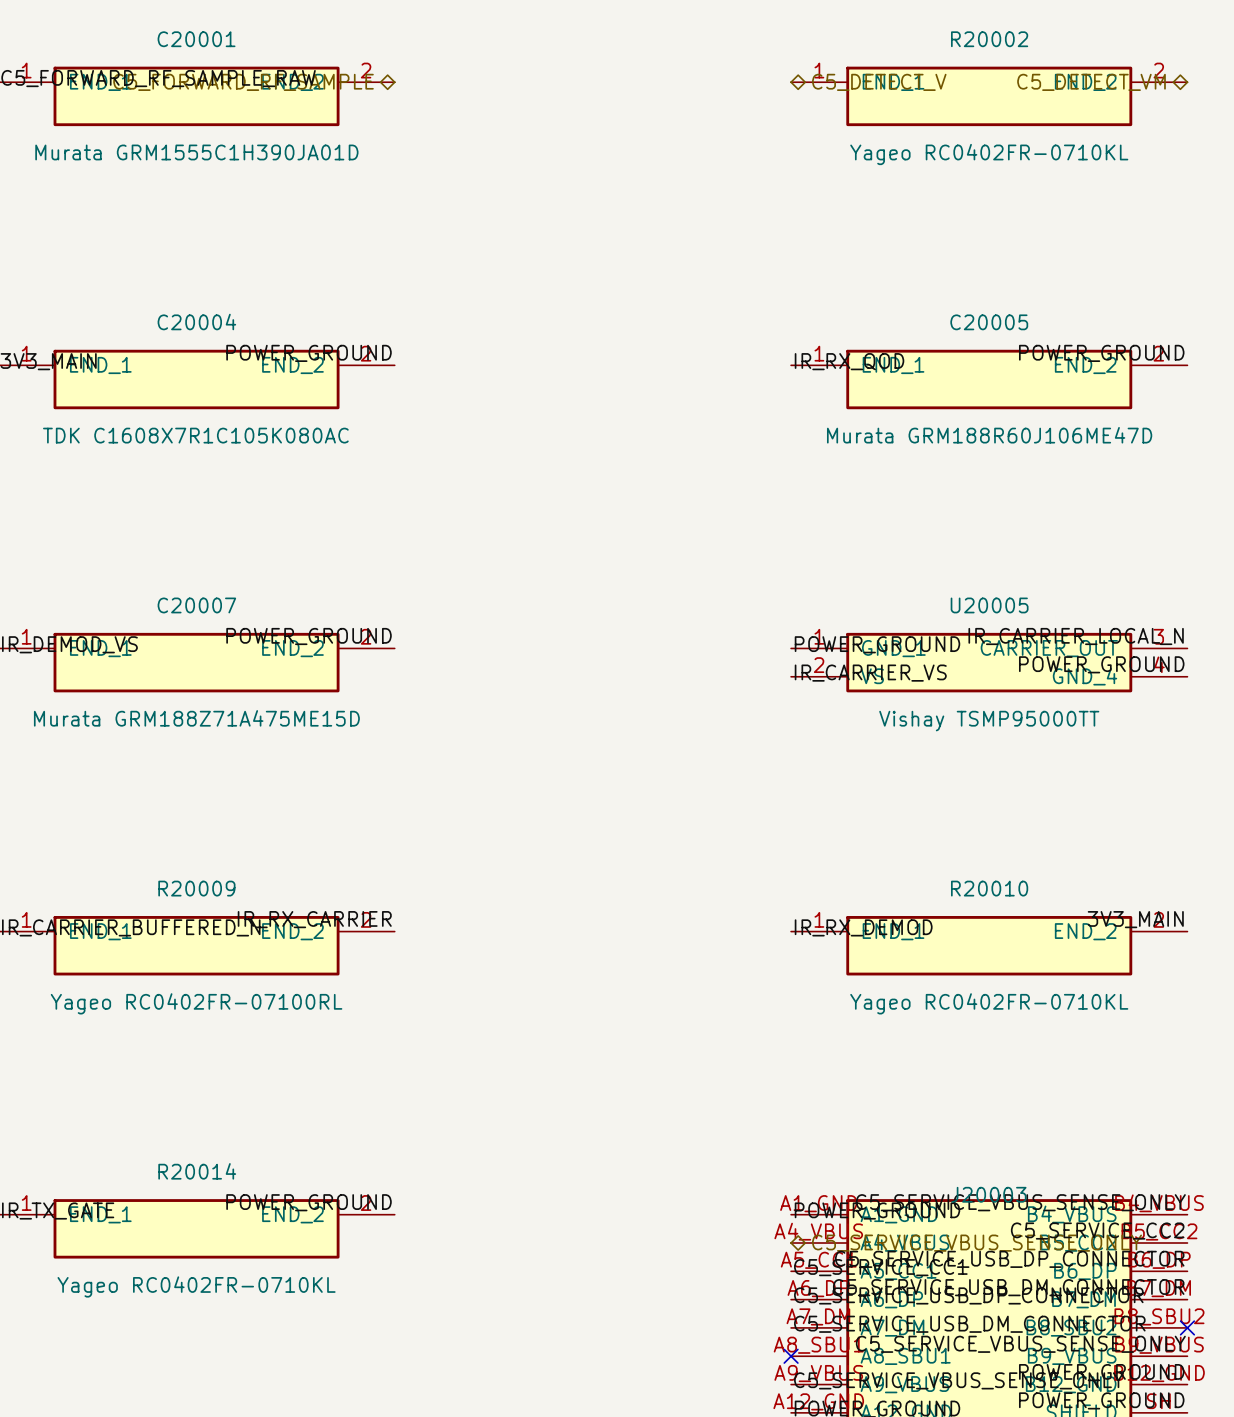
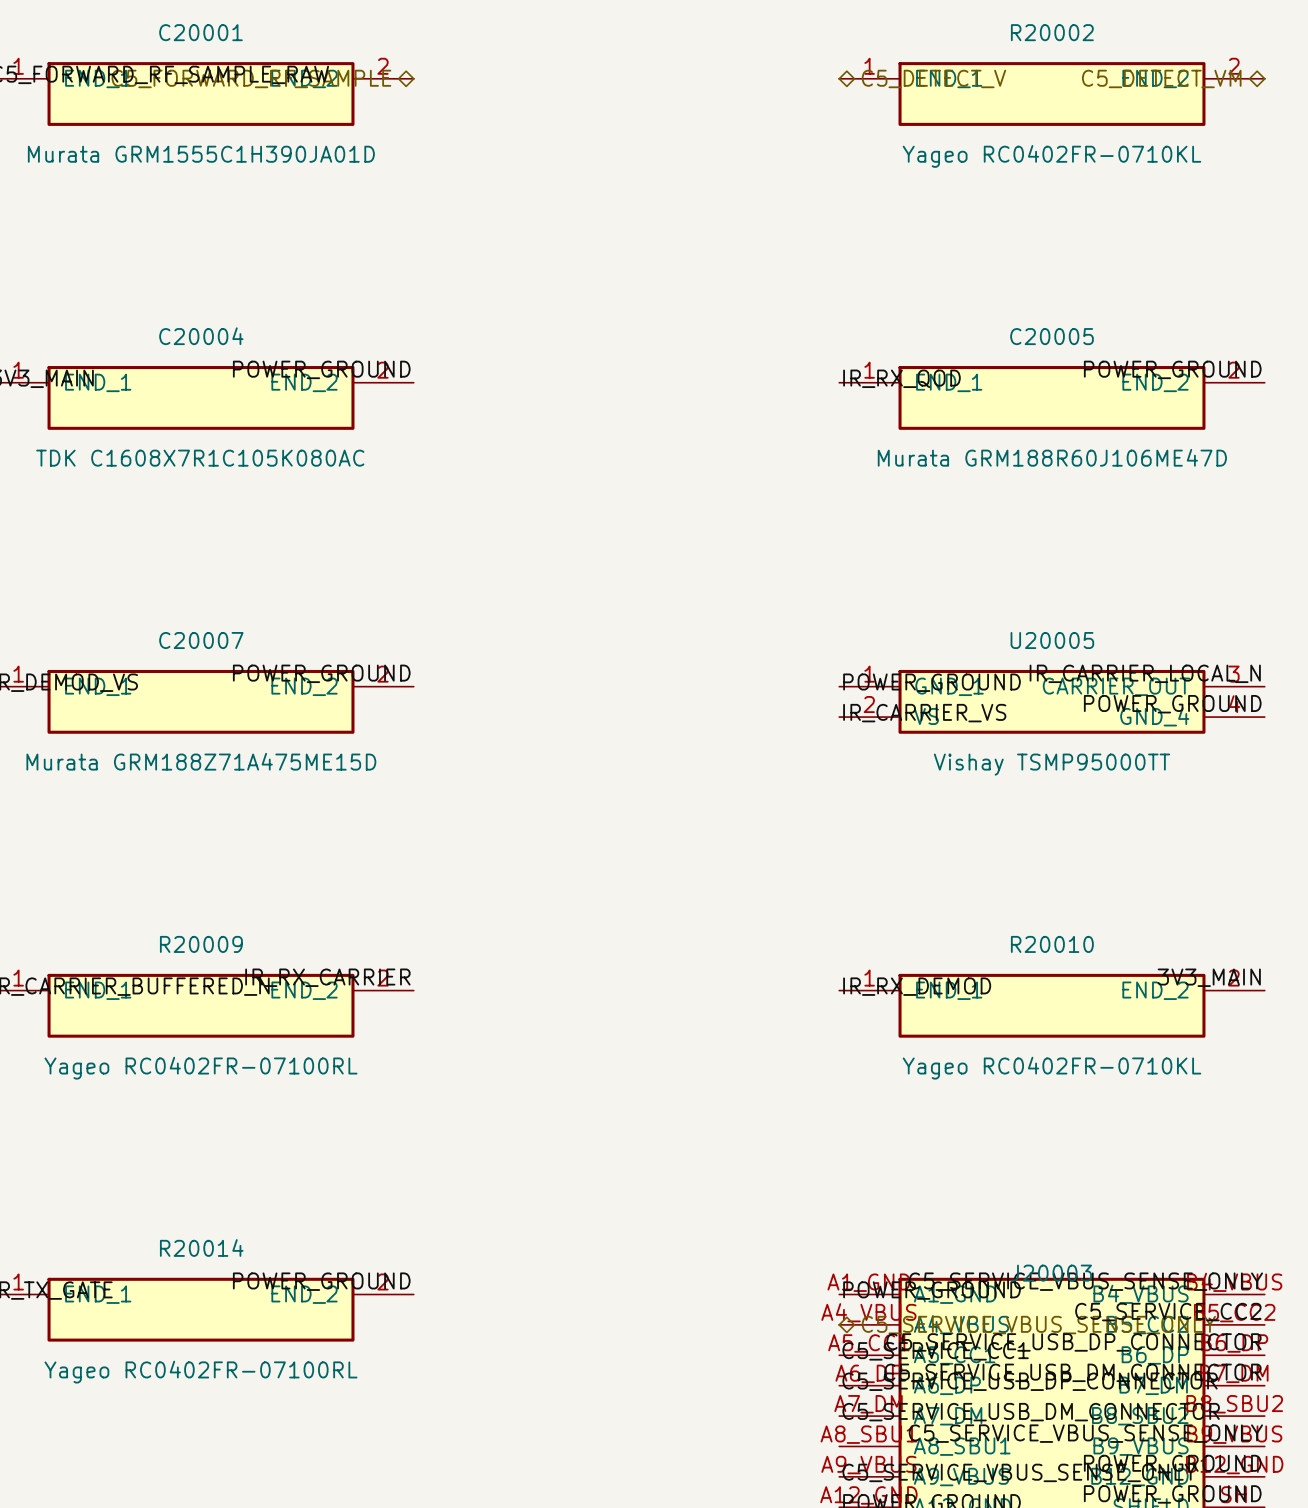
R20014 value: Yageo RC0402FR-0710KL (196, 1286) -> Yageo RC0402FR-07100RL (201, 1372)
no-connect mark: (1187, 1327) -> none
no-connect mark: (791, 1356) -> none

